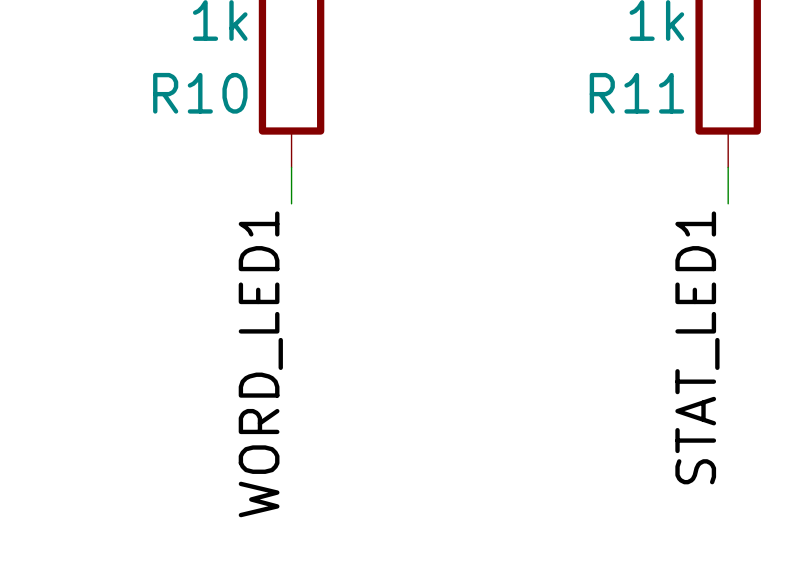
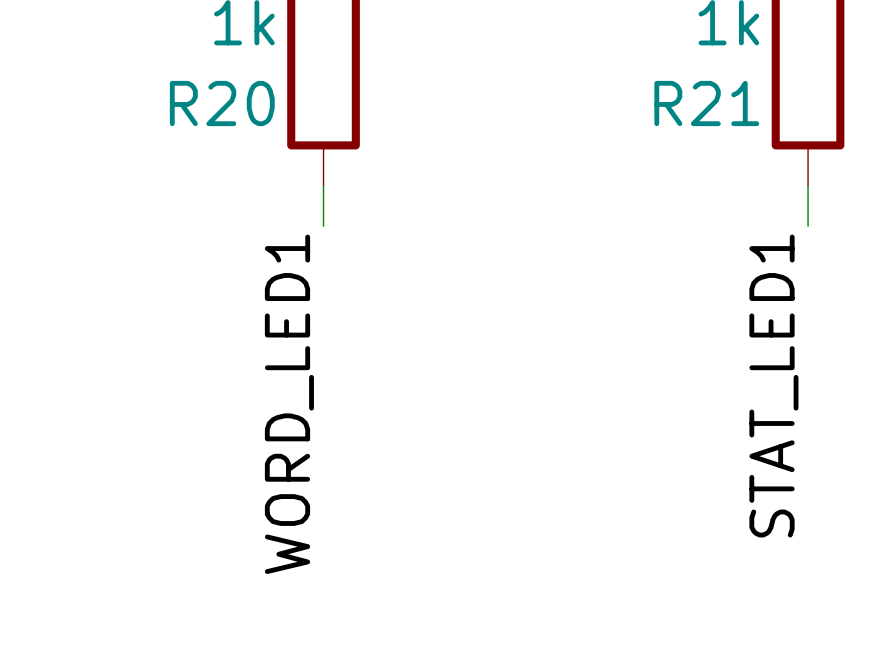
R10 name: R10 (200, 93) -> R20 (222, 103)
R11 name: R11 (636, 93) -> R21 (706, 103)

